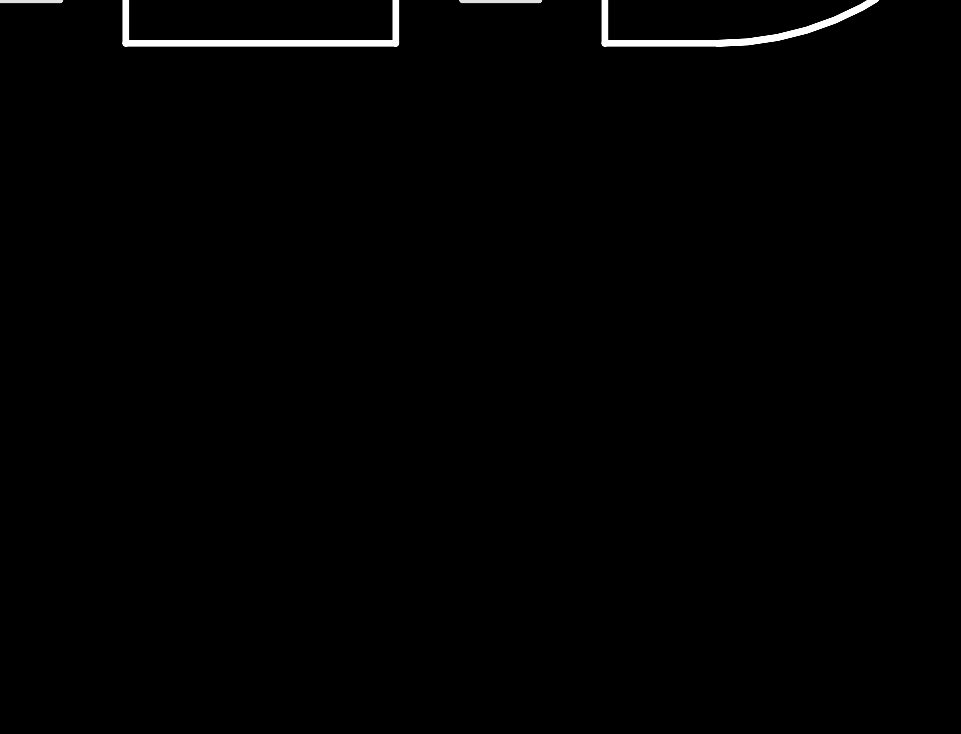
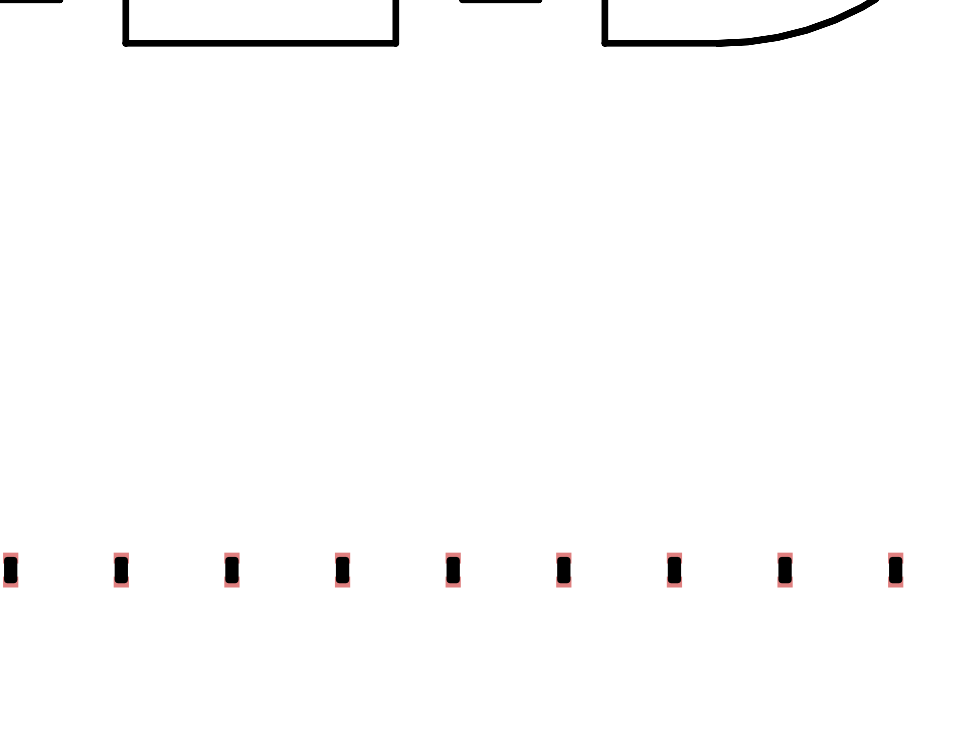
part: none -> (10, 570)
part: none -> (121, 570)
part: none -> (231, 570)
part: none -> (342, 570)
part: none -> (453, 570)
part: none -> (563, 570)
part: none -> (674, 570)
part: none -> (785, 570)
part: none -> (895, 570)

